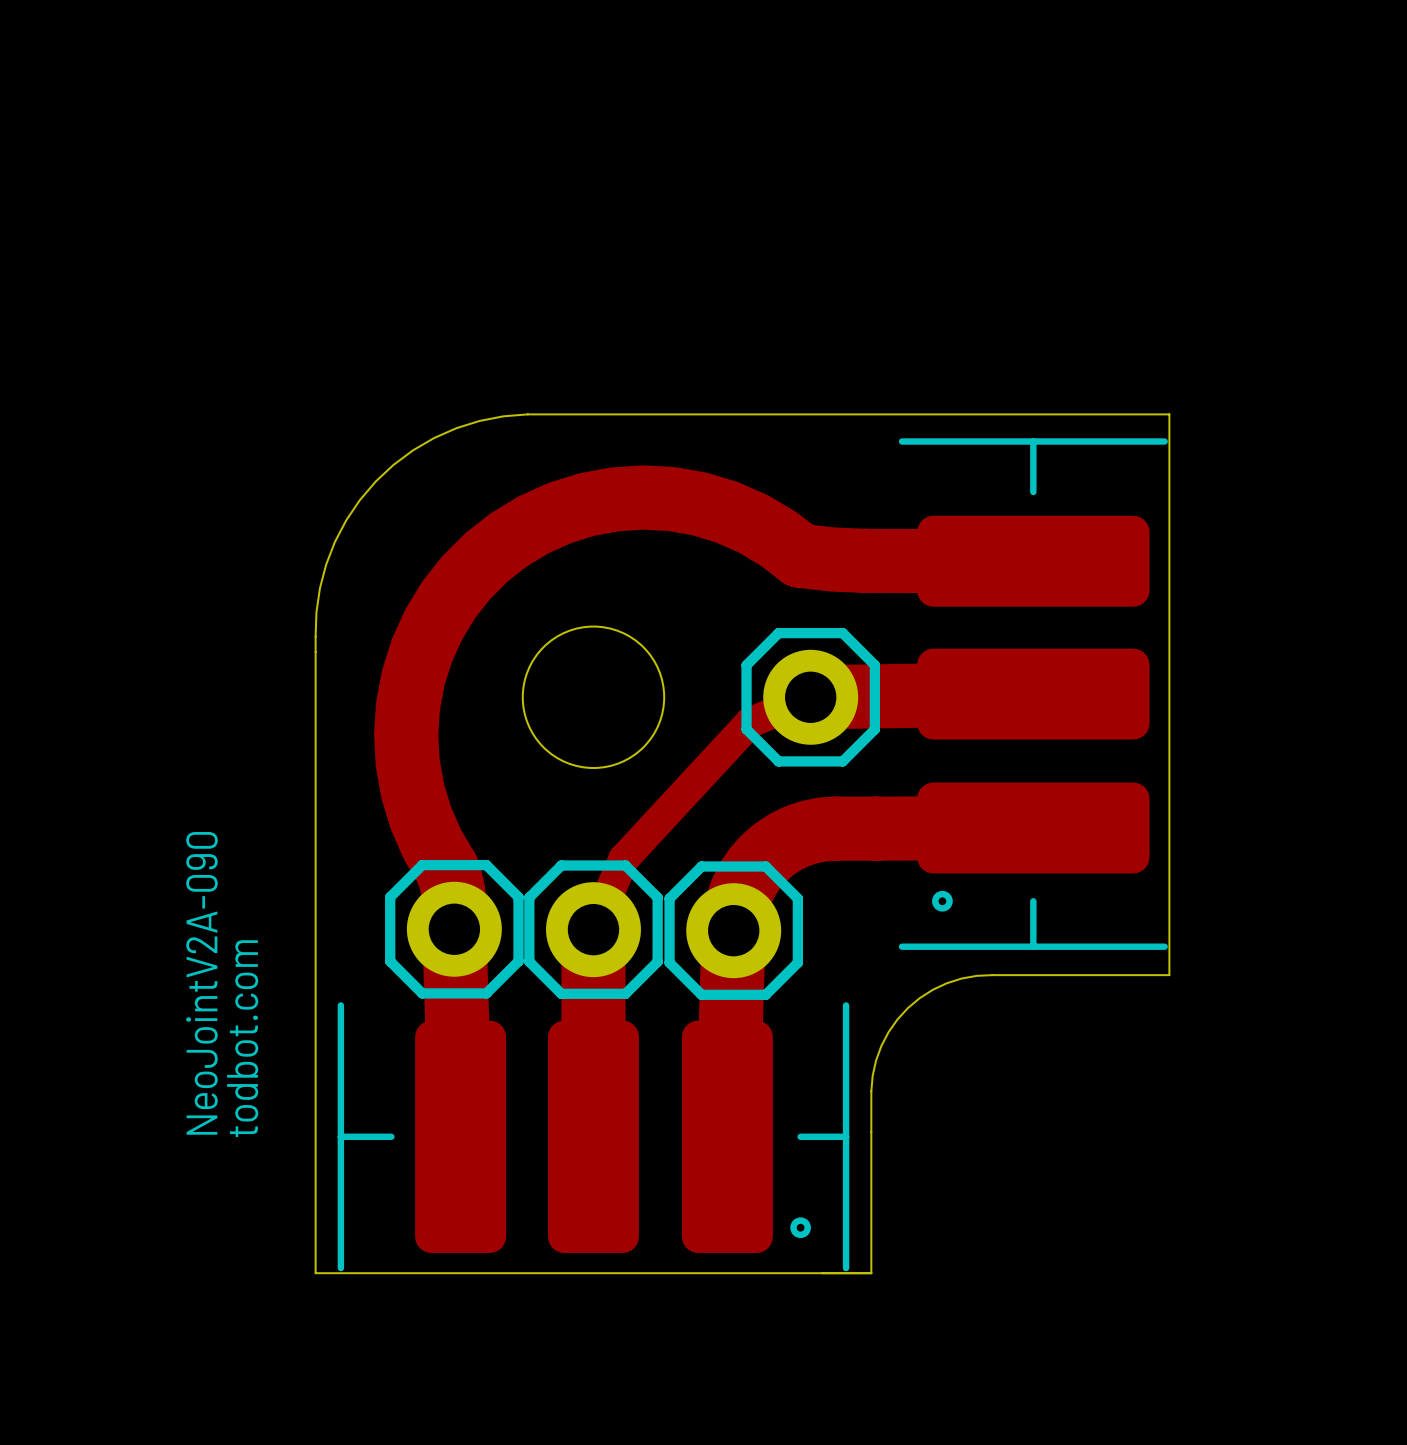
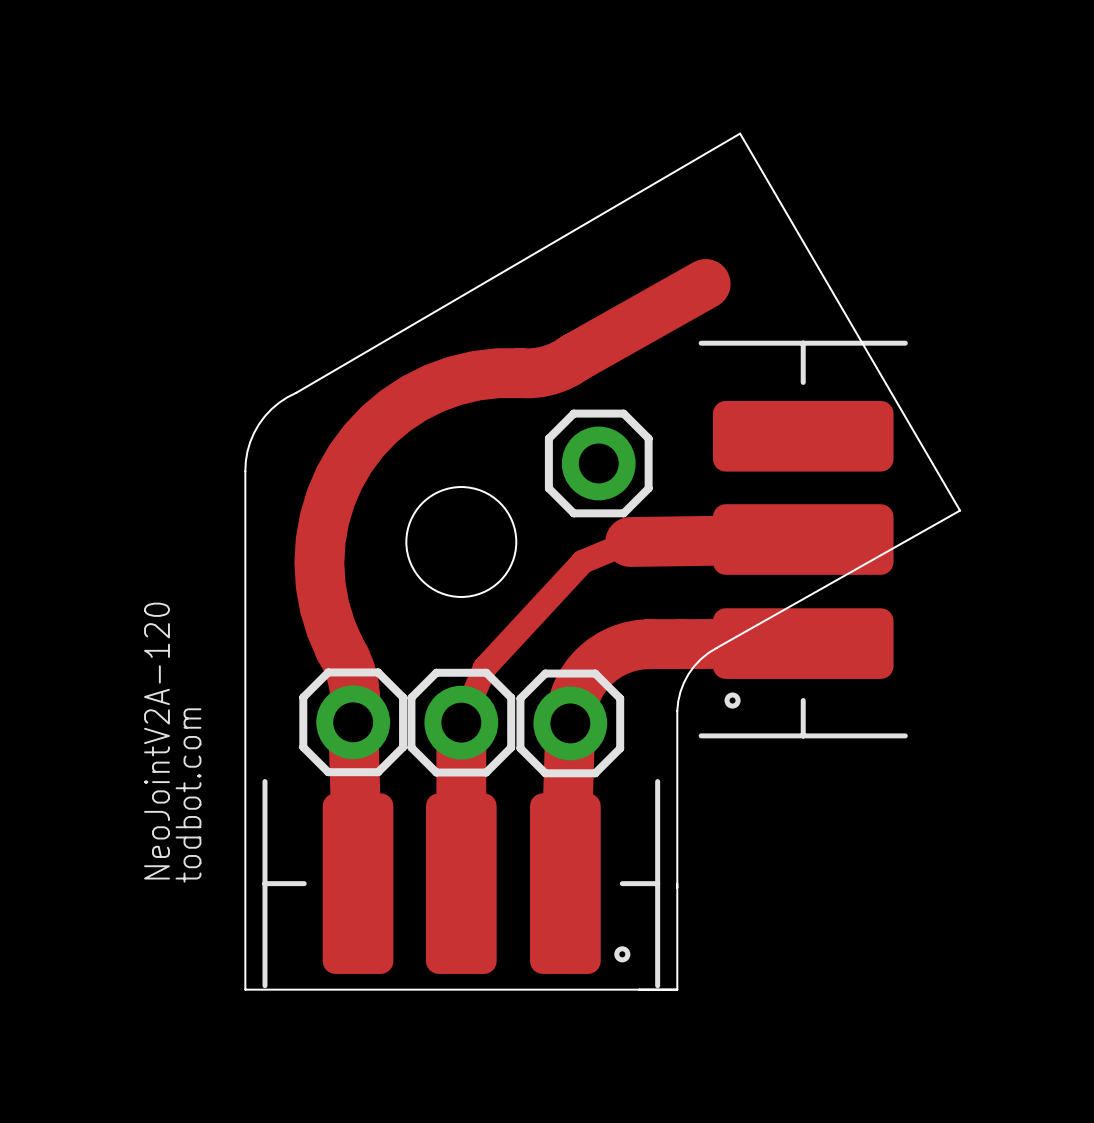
track: (1033, 561) (866, 560) (800, 555) (777, 538) (753, 523) (727, 512) (699, 504) (671, 499) (643, 497) (614, 499) (586, 504) (559, 513) (533, 524) (508, 539) (486, 557) (466, 577) (448, 600) (433, 624) (421, 650) (413, 677) (408, 705) (406, 734) (407, 762) (412, 790) (420, 818) (450, 879) (454, 912) (452, 934) (454, 929) -> (705, 283) (558, 367) (539, 372) (476, 375) (433, 388) (395, 410) (363, 440) (350, 458) (330, 497) (320, 540) (319, 562) (324, 606) (330, 627) (345, 659) (353, 683) (355, 709) (353, 722)
board edge: (315, 636) (316, 612) (326, 564) (334, 541) (359, 500) (375, 481) (413, 450) (456, 428) (479, 420) (527, 414) (1169, 414) (1169, 975) (992, 975) (961, 978) (946, 983) (932, 989) (907, 1008) (888, 1032) (876, 1060) (871, 1091) -> (245, 494) (245, 461) (250, 442) (258, 424) (279, 402) (740, 133) (960, 510) (716, 648) (694, 666) (680, 691) (677, 710) (677, 848)
part position: (810, 697) -> (598, 463)
text: NeoJointV2A-090 (201, 983) -> NeoJointV2A-120 (157, 741)

